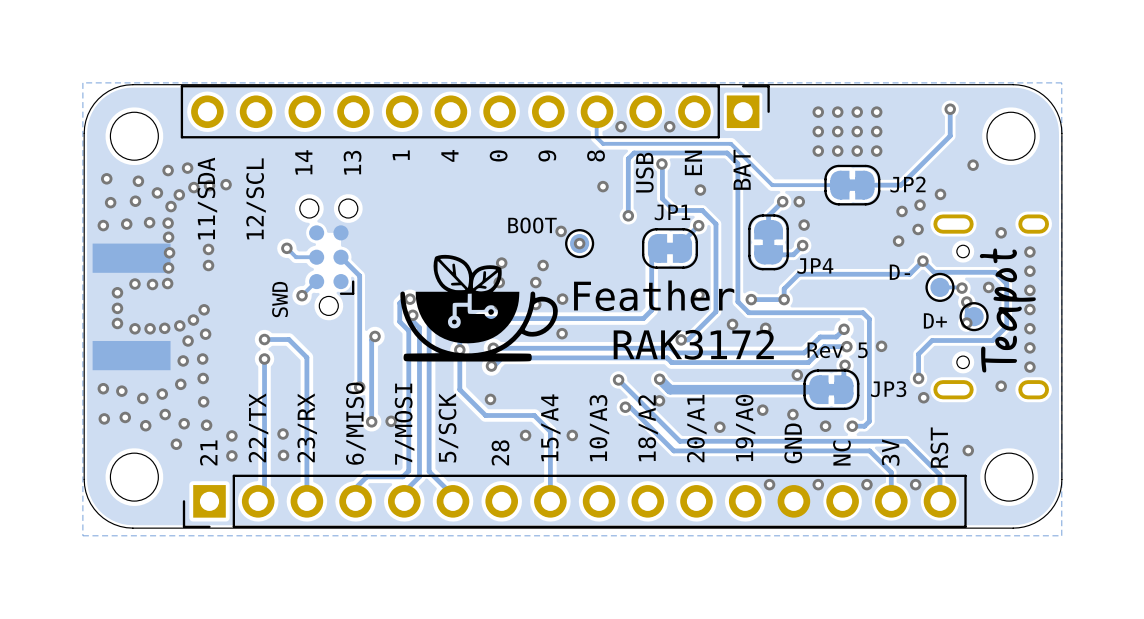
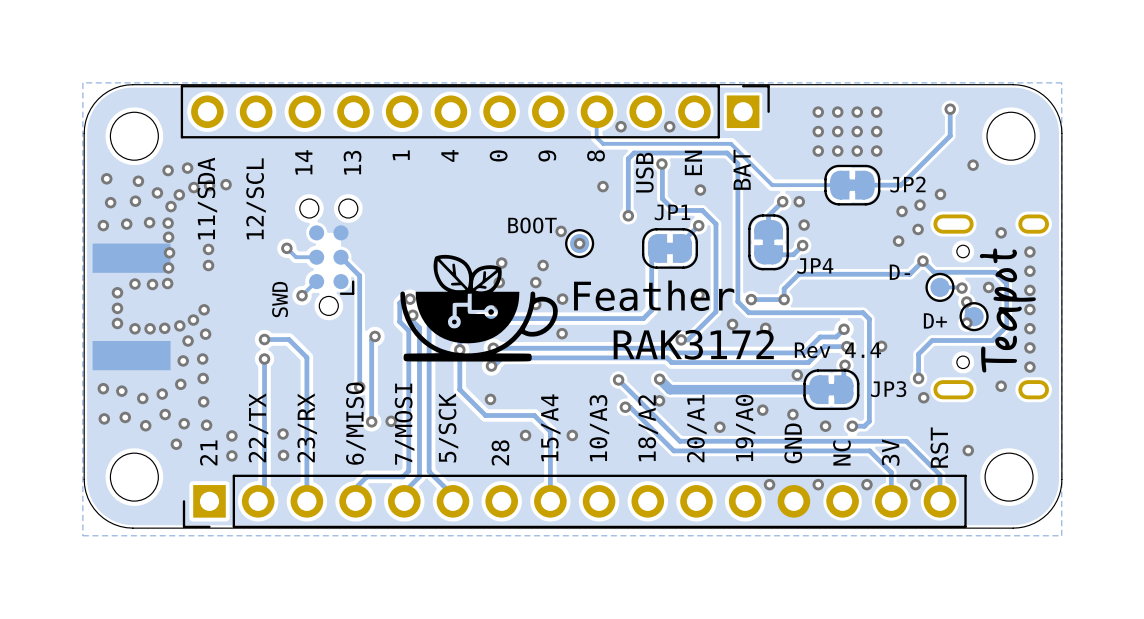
text: Rev 5 (837, 350) -> Rev 4.4 (837, 350)

